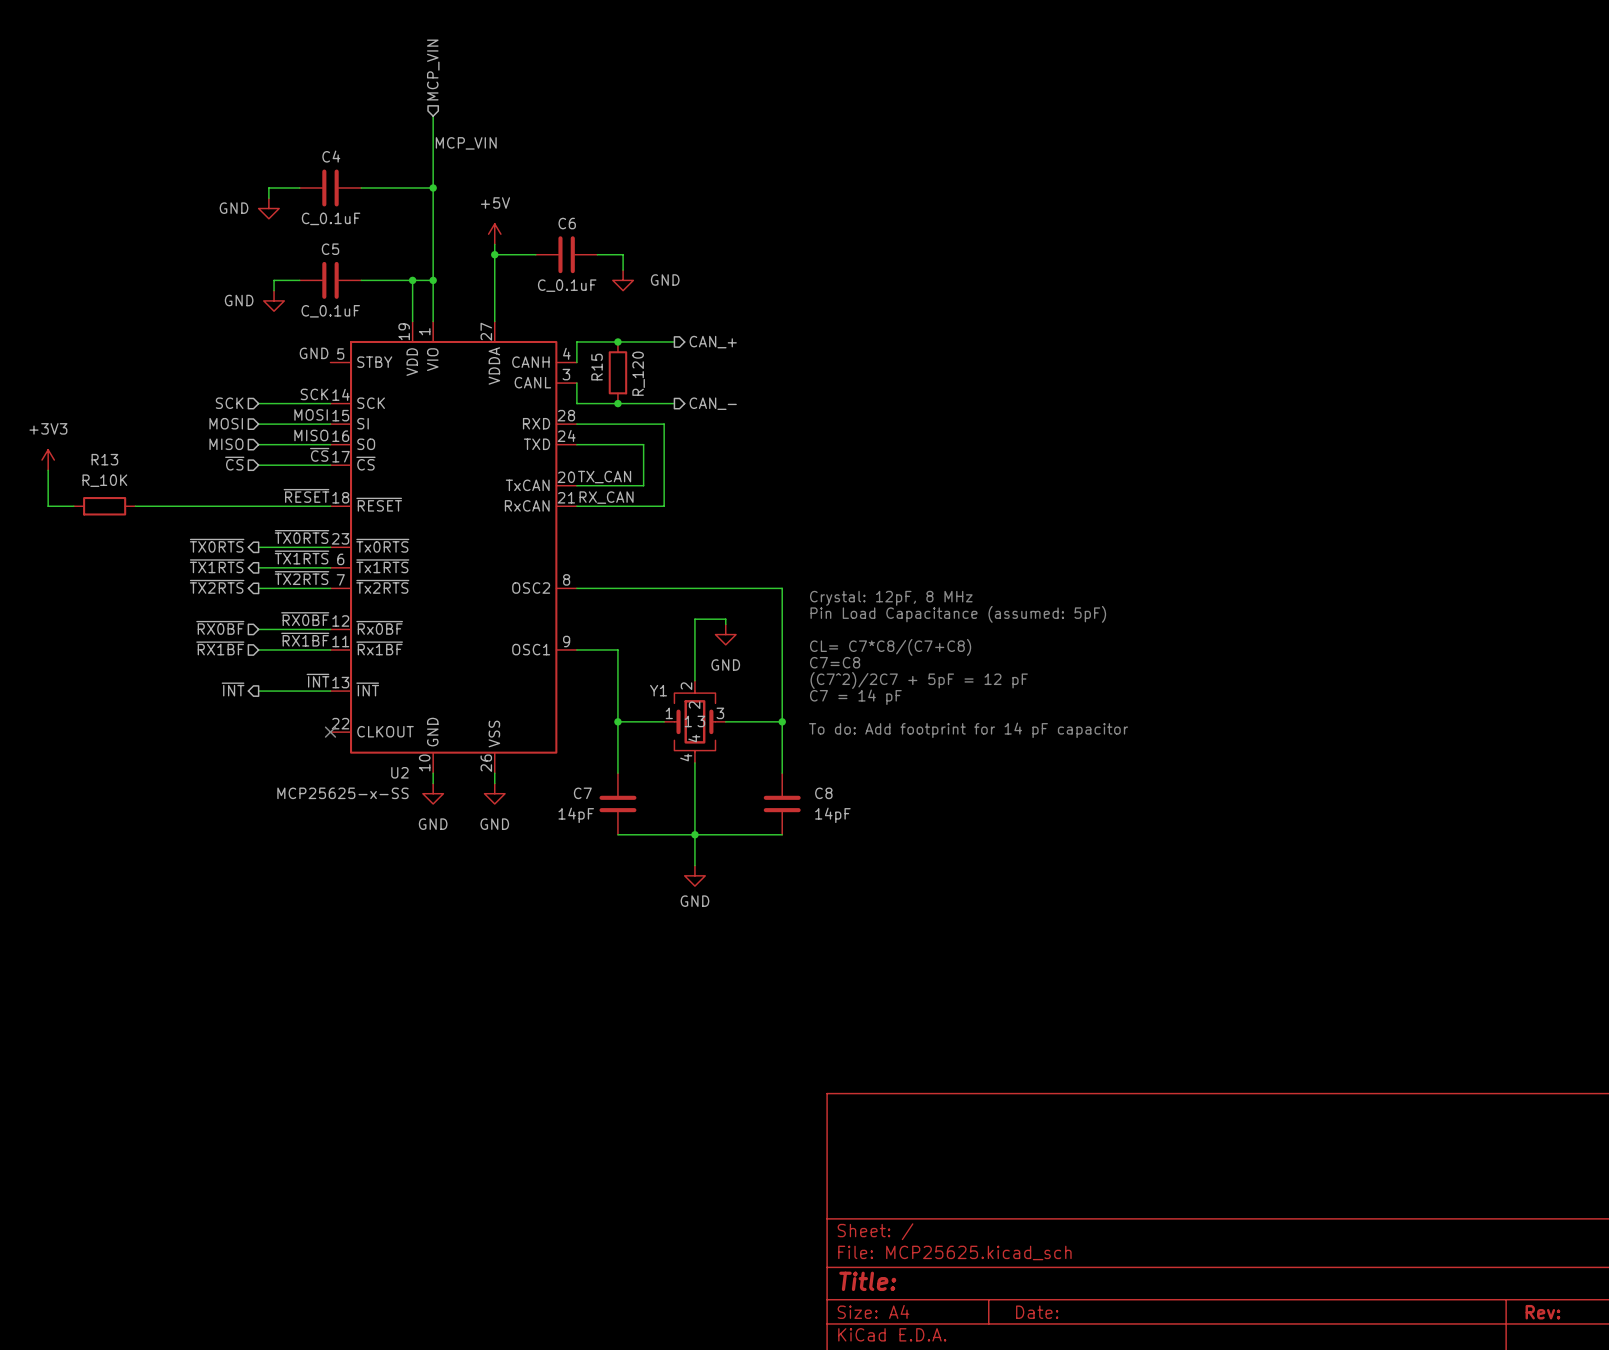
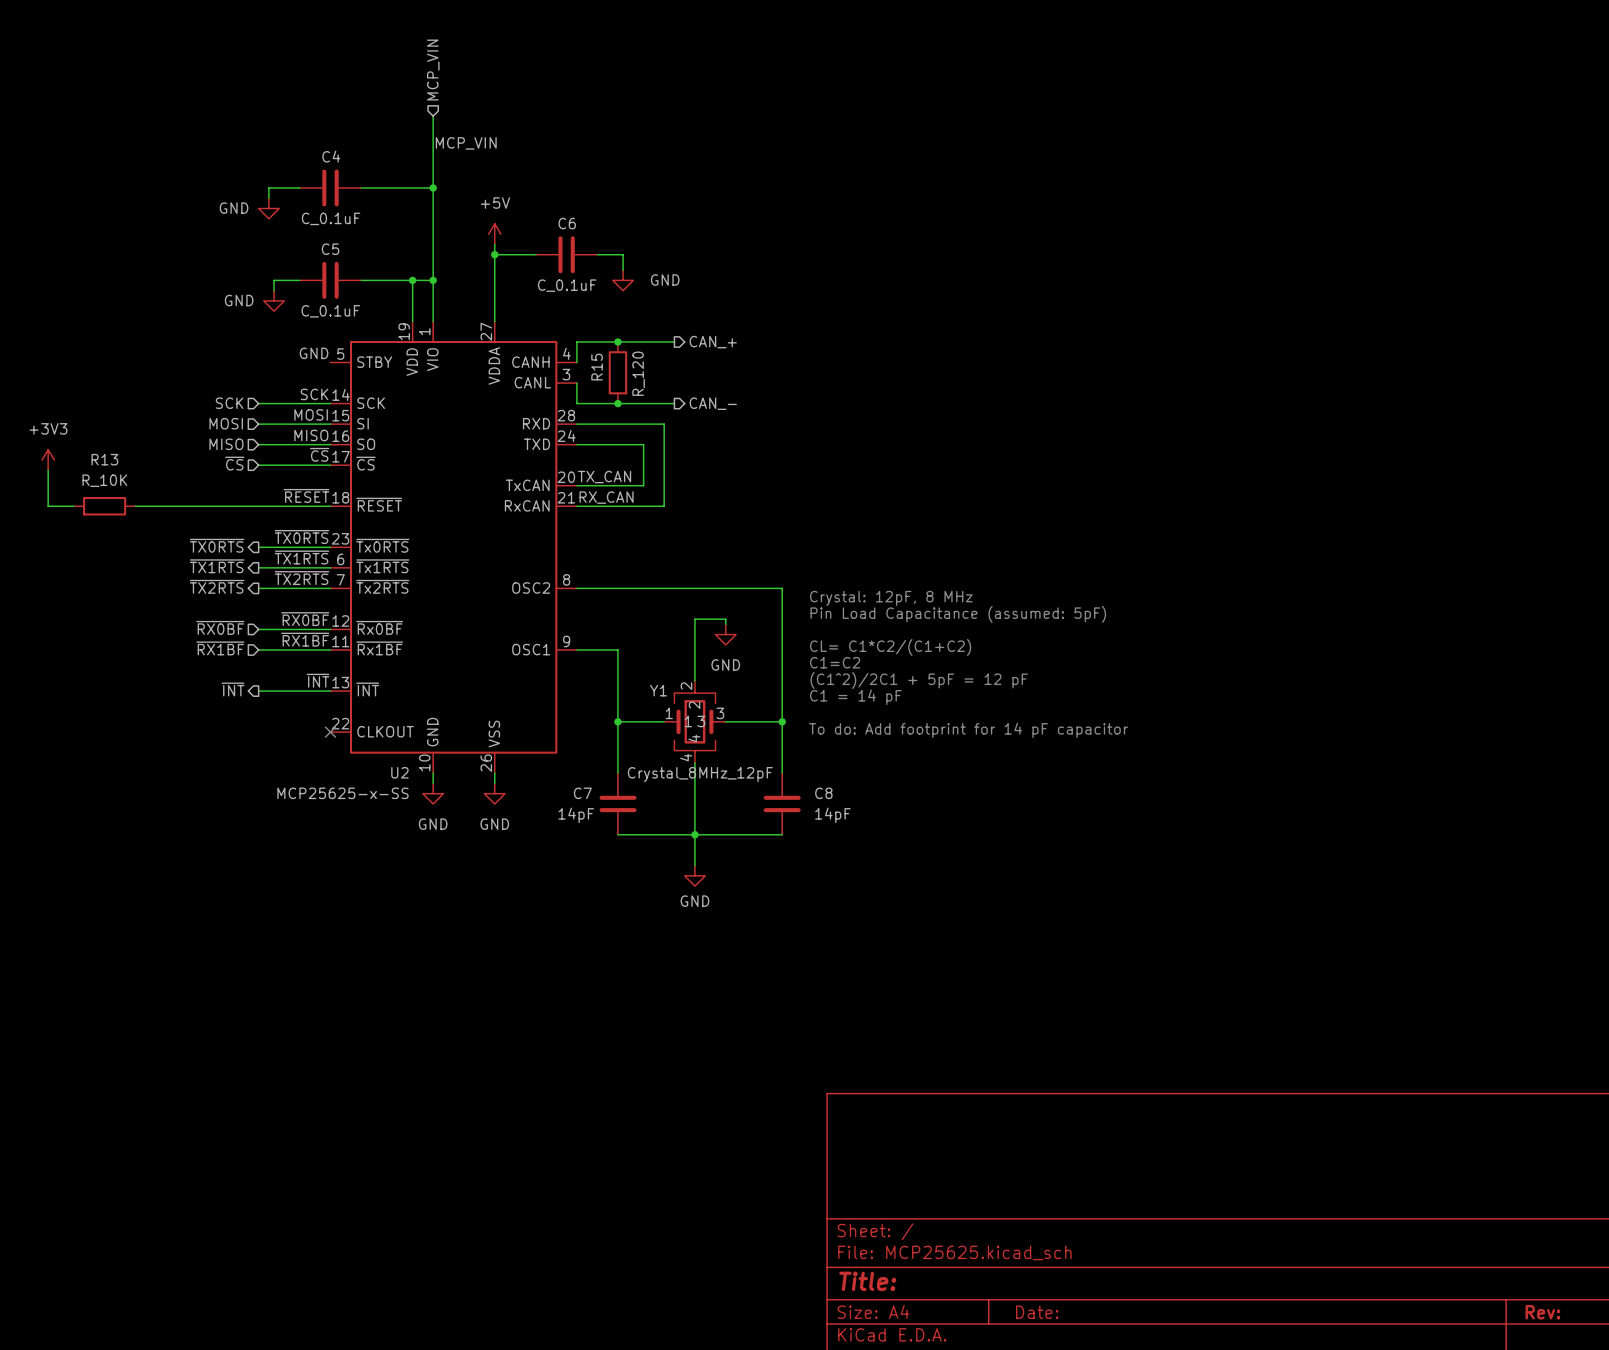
text: CL= C7*C8/(C7+C8) (890, 647) -> CL= C1*C2/(C1+C2) (890, 647)
text: C7=C8 (835, 662) -> C1=C2 (835, 662)
text: (C7^2)/2C7 + 5pF = 12 pF (919, 680) -> (C1^2)/2C1 + 5pF = 12 pF (919, 680)
text: C7 = 14 pF (855, 697) -> C1 = 14 pF (855, 697)
Y1 value: none -> Crystal_8MHz_12pF (700, 774)

